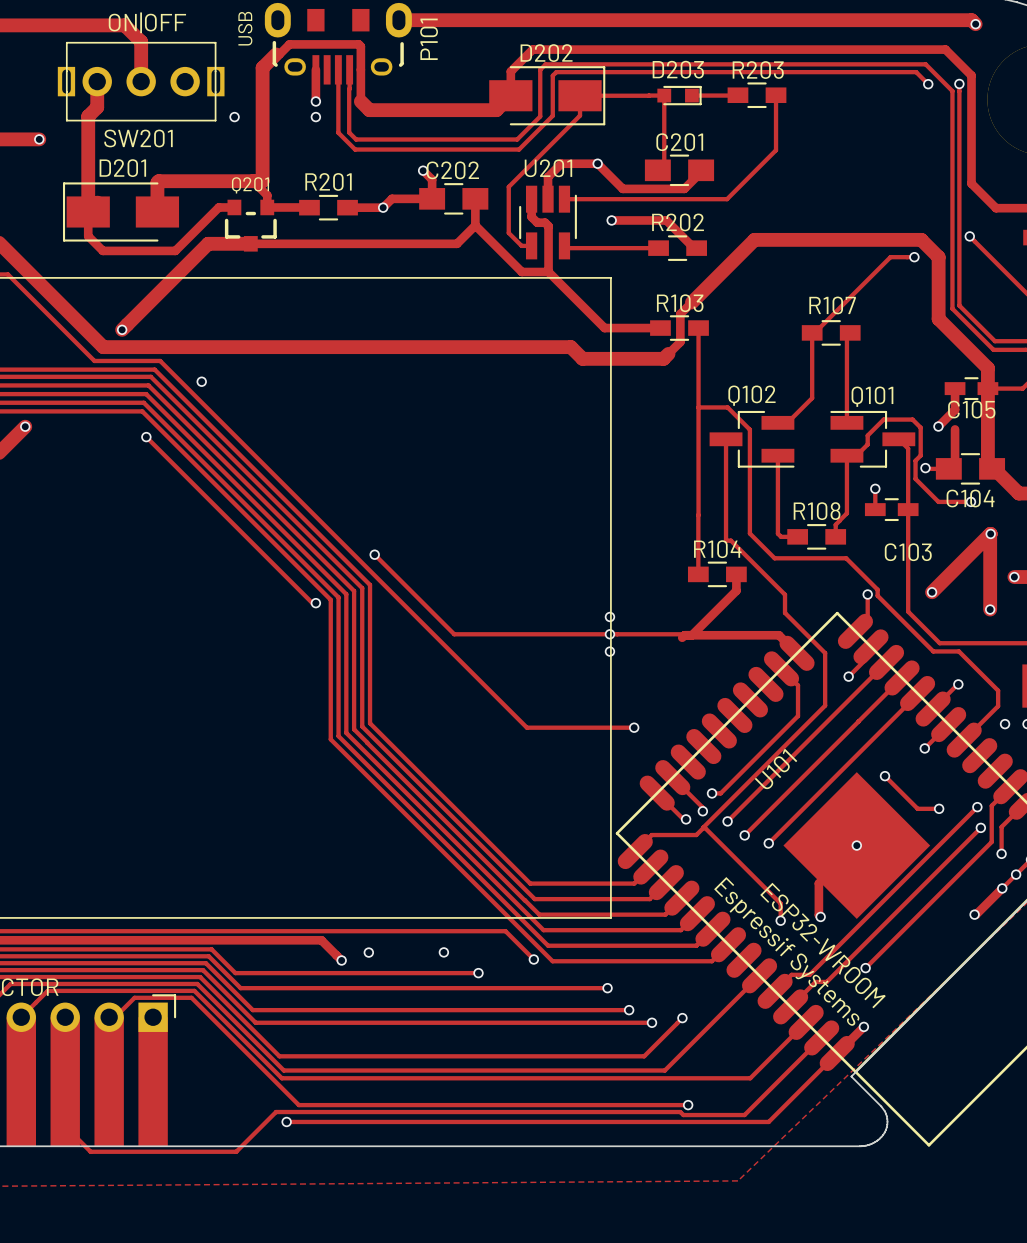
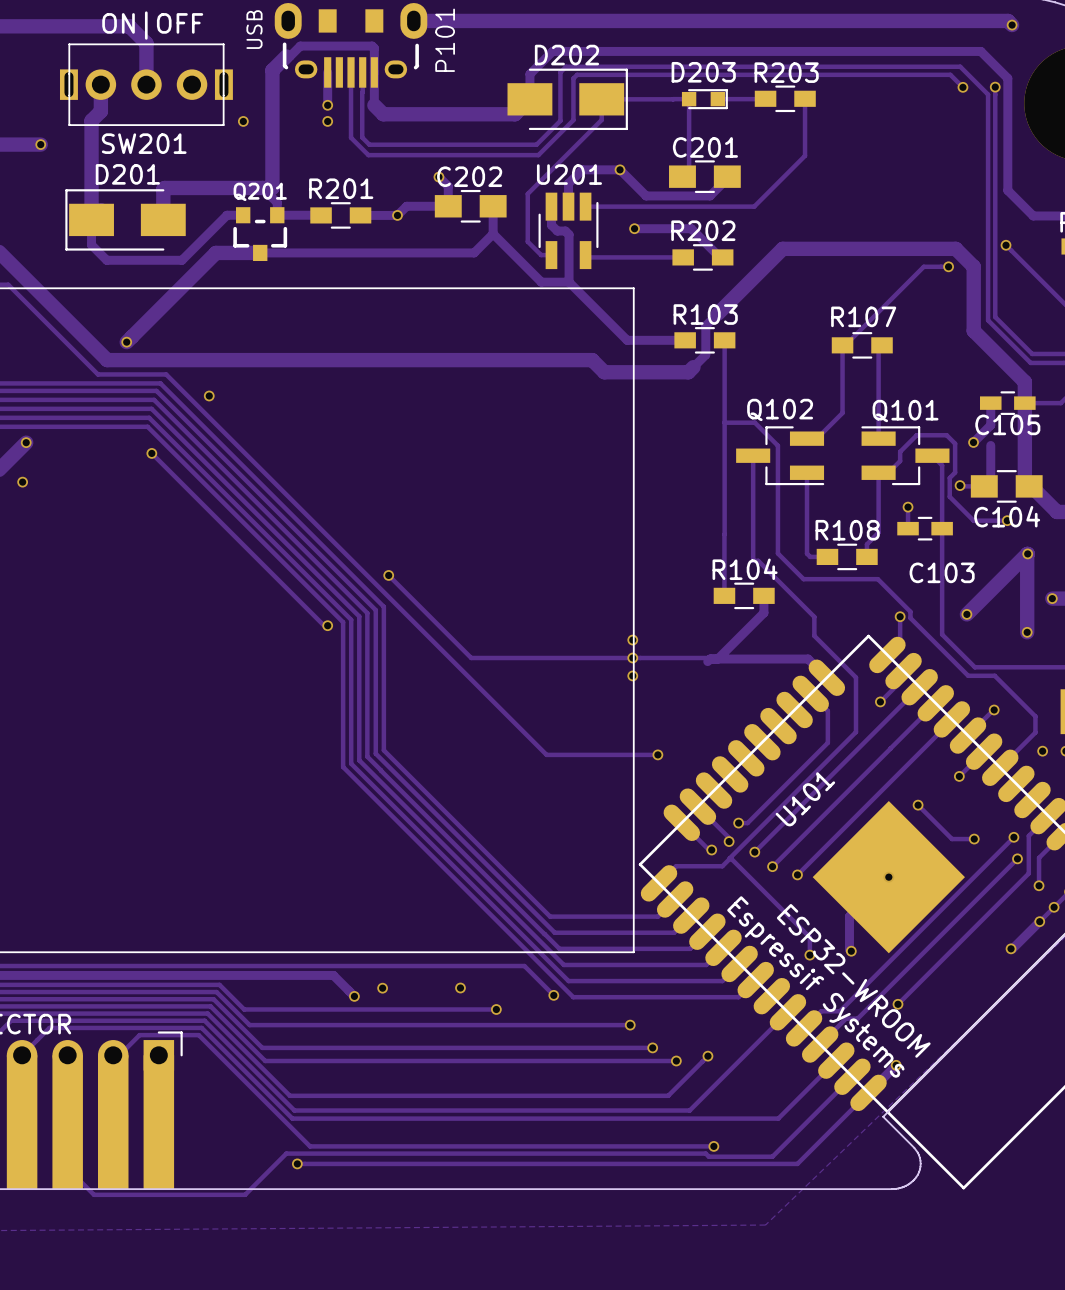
via: none -> (22, 482)

